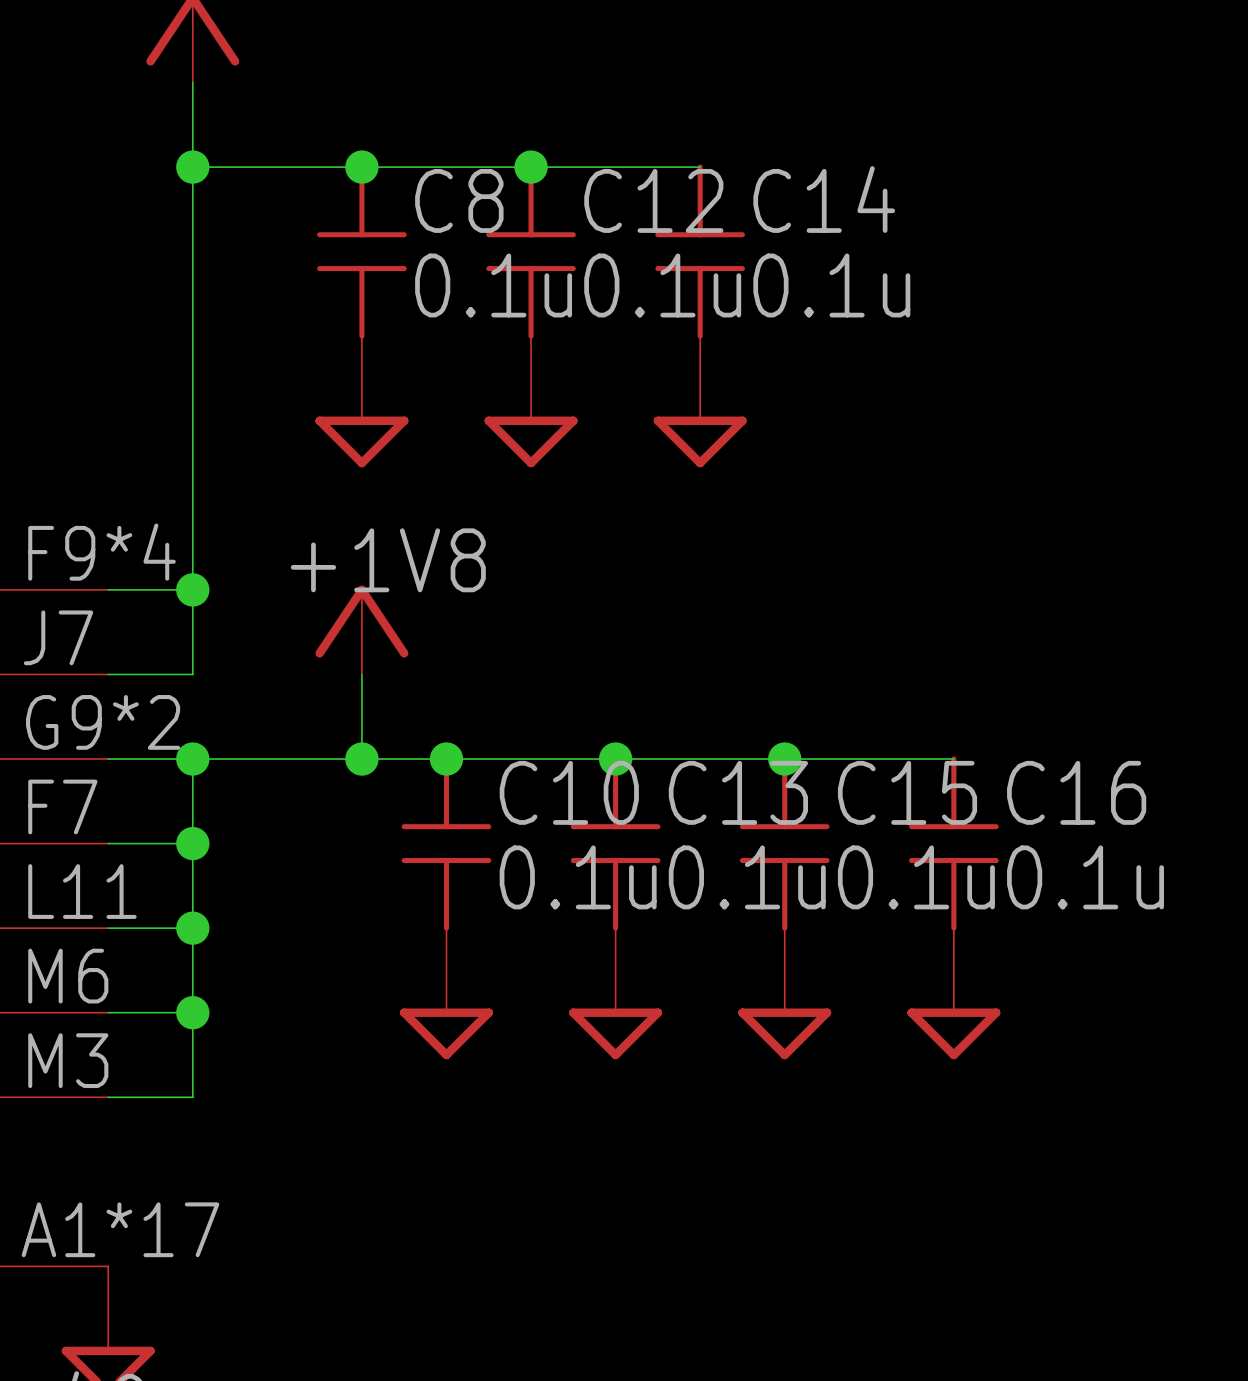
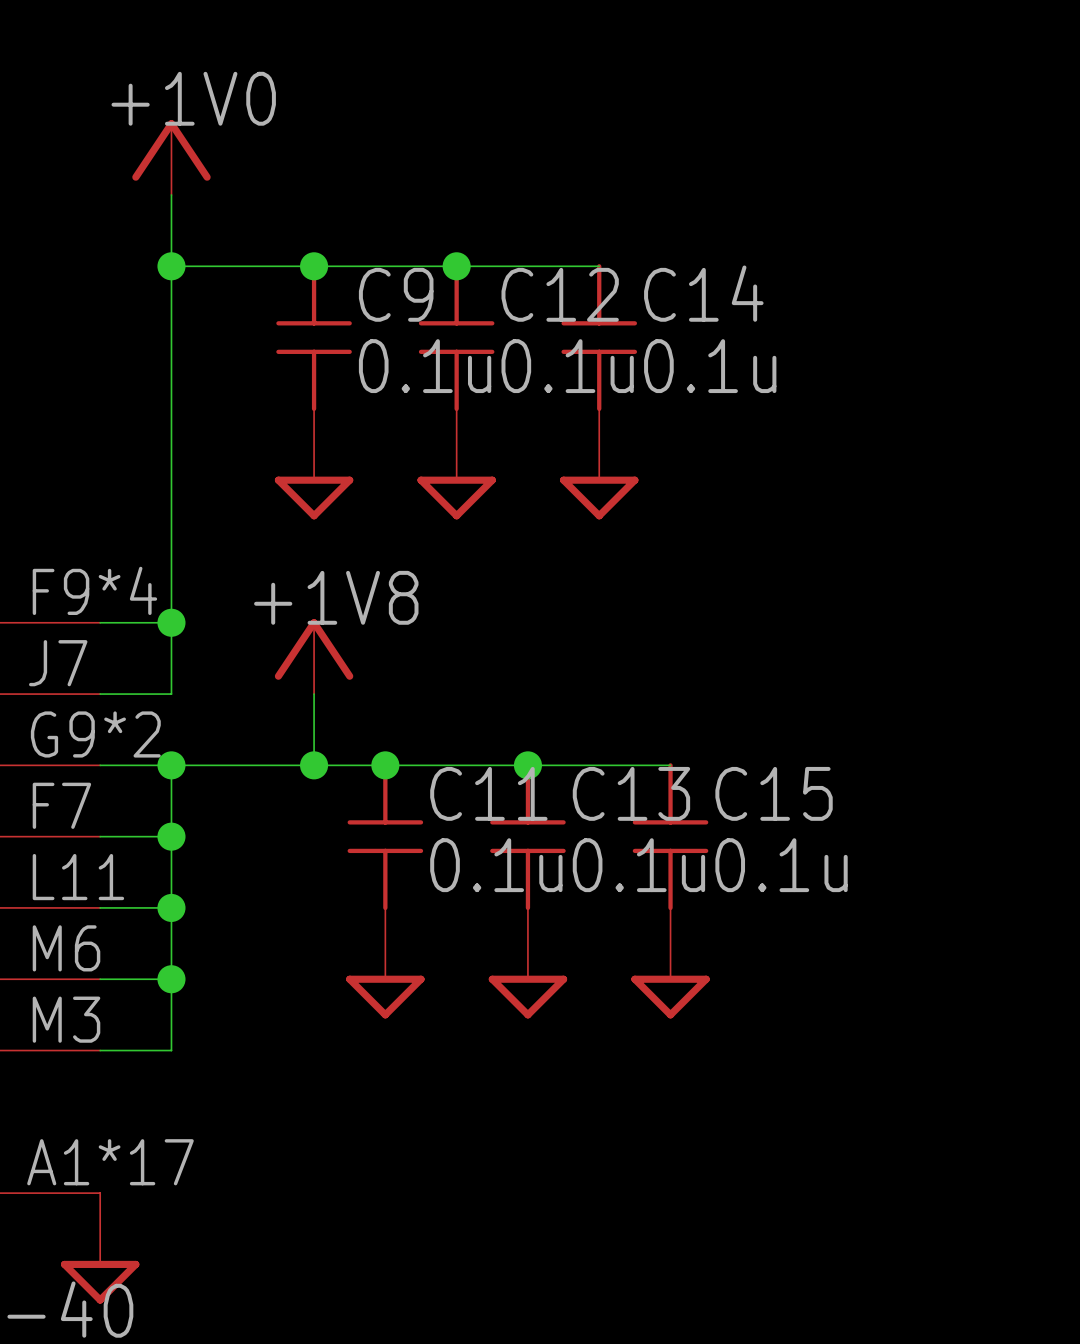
C8 name: C8 (459, 200) -> C9 (396, 294)
wire: (784, 759) (953, 759) -> none
junction: (784, 759) -> none
C10 name: C10 (569, 792) -> C11 (488, 793)
C16: 0.1u (953, 843) -> none
power symbol: (953, 993) -> none

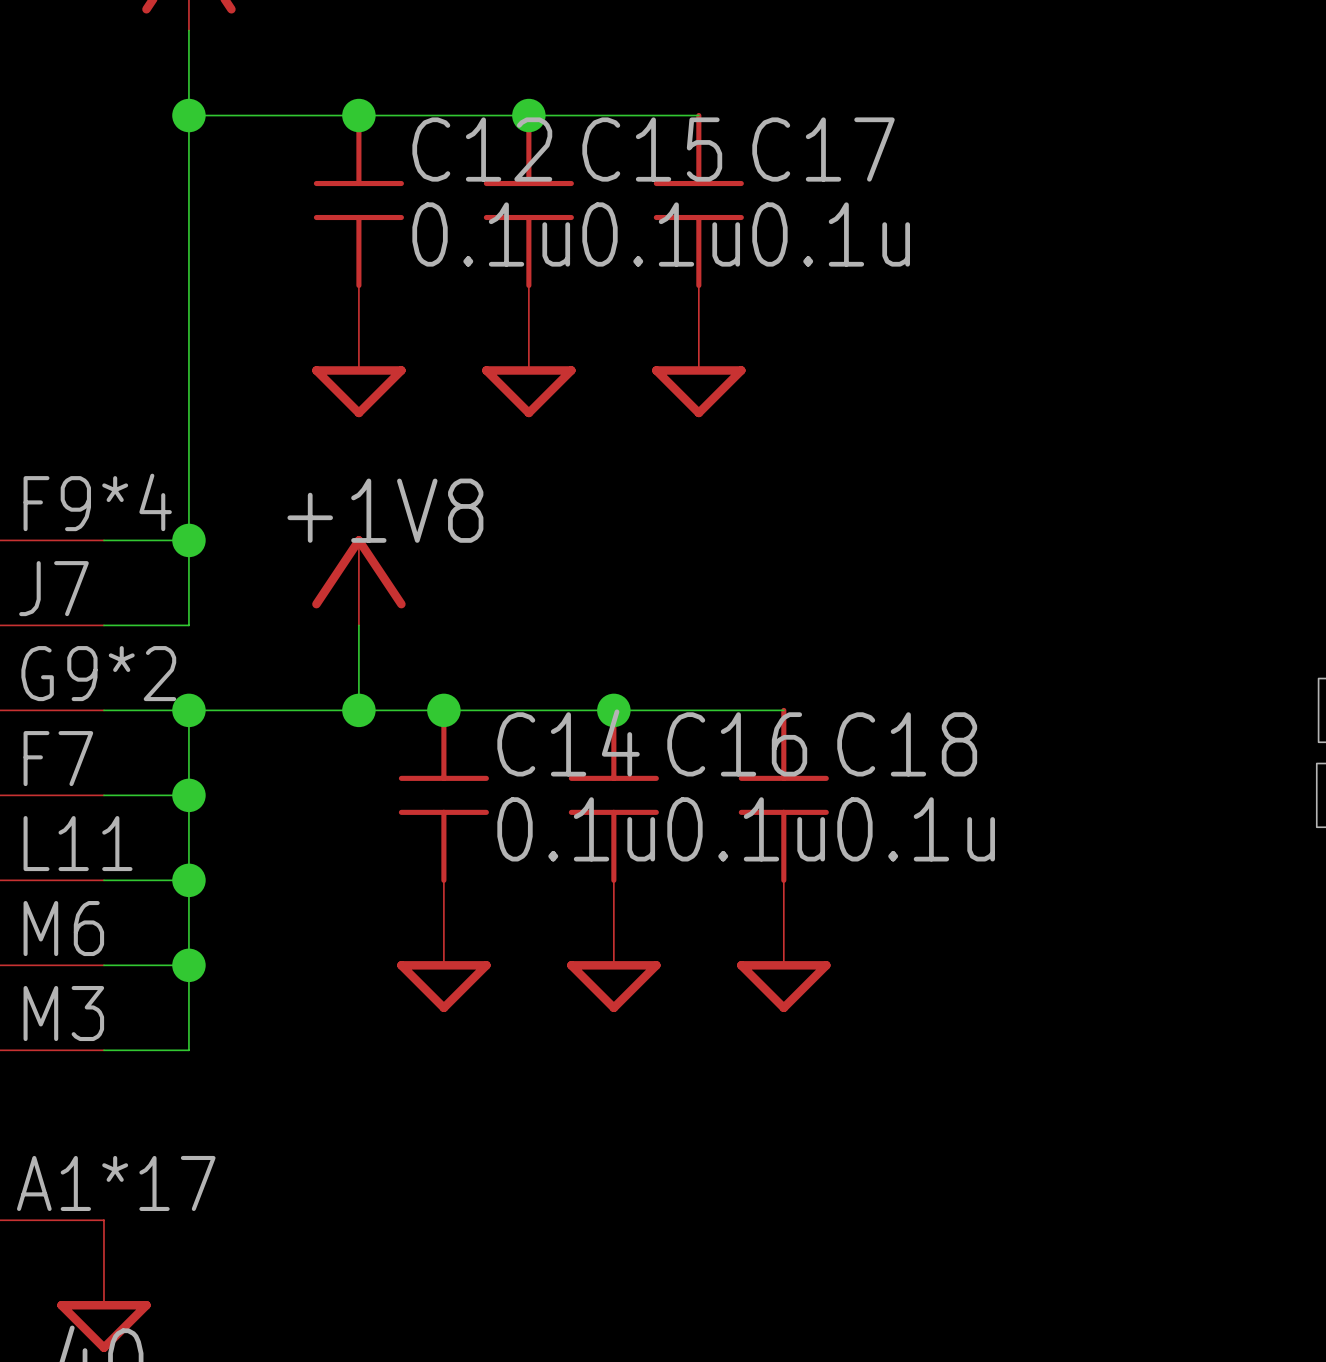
C14 name: C14 (703, 293) -> C17 (823, 149)
C9 name: C9 (396, 294) -> C12 (482, 149)
C12 name: C12 (560, 294) -> C15 (652, 149)
C11 name: C11 (488, 793) -> C14 (568, 742)
C13 name: C13 (631, 793) -> C16 (737, 744)
C15 name: C15 (774, 793) -> C18 (907, 744)

